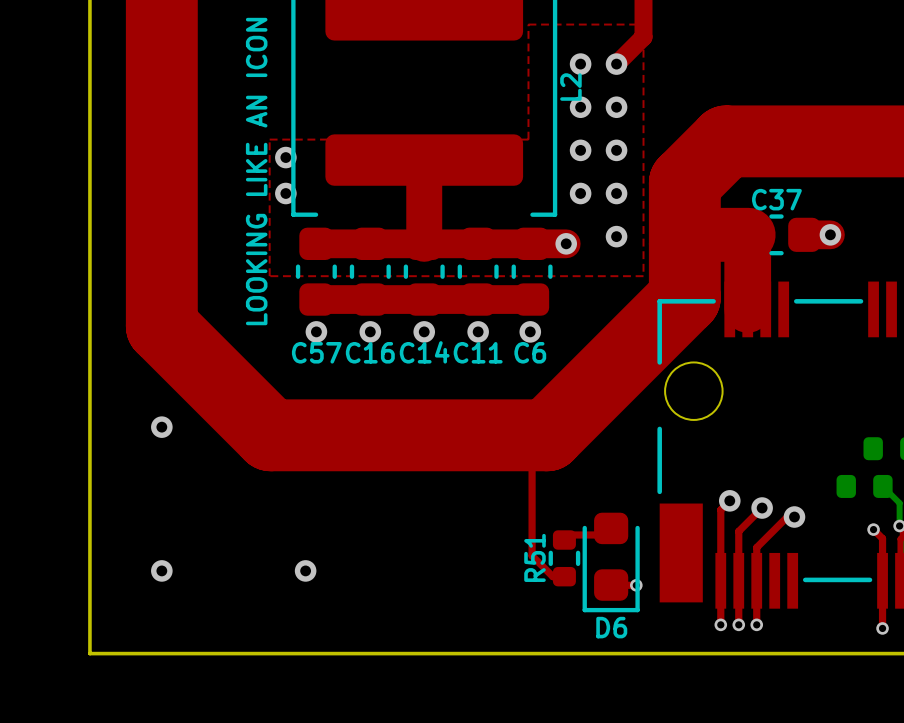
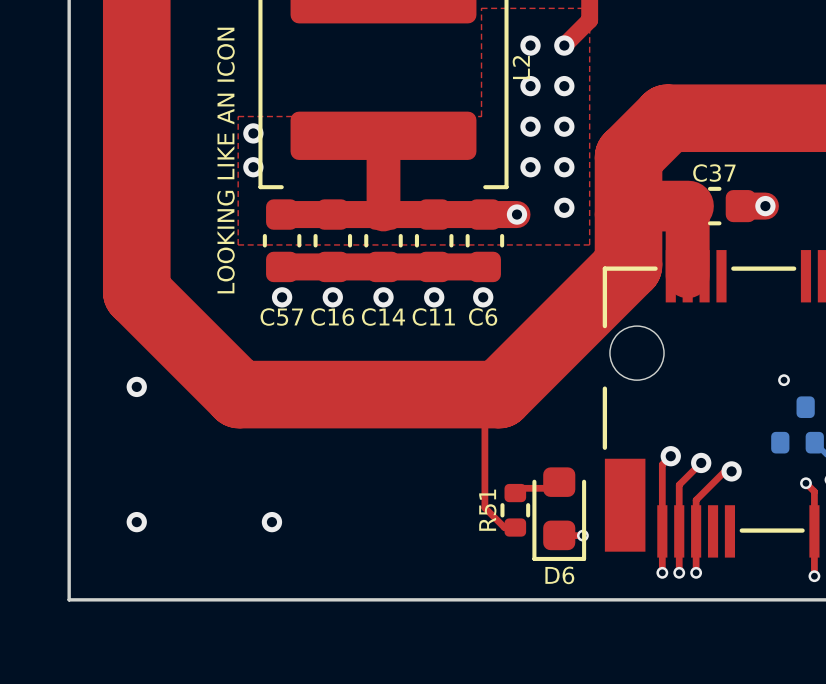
via: none -> (784, 380)

